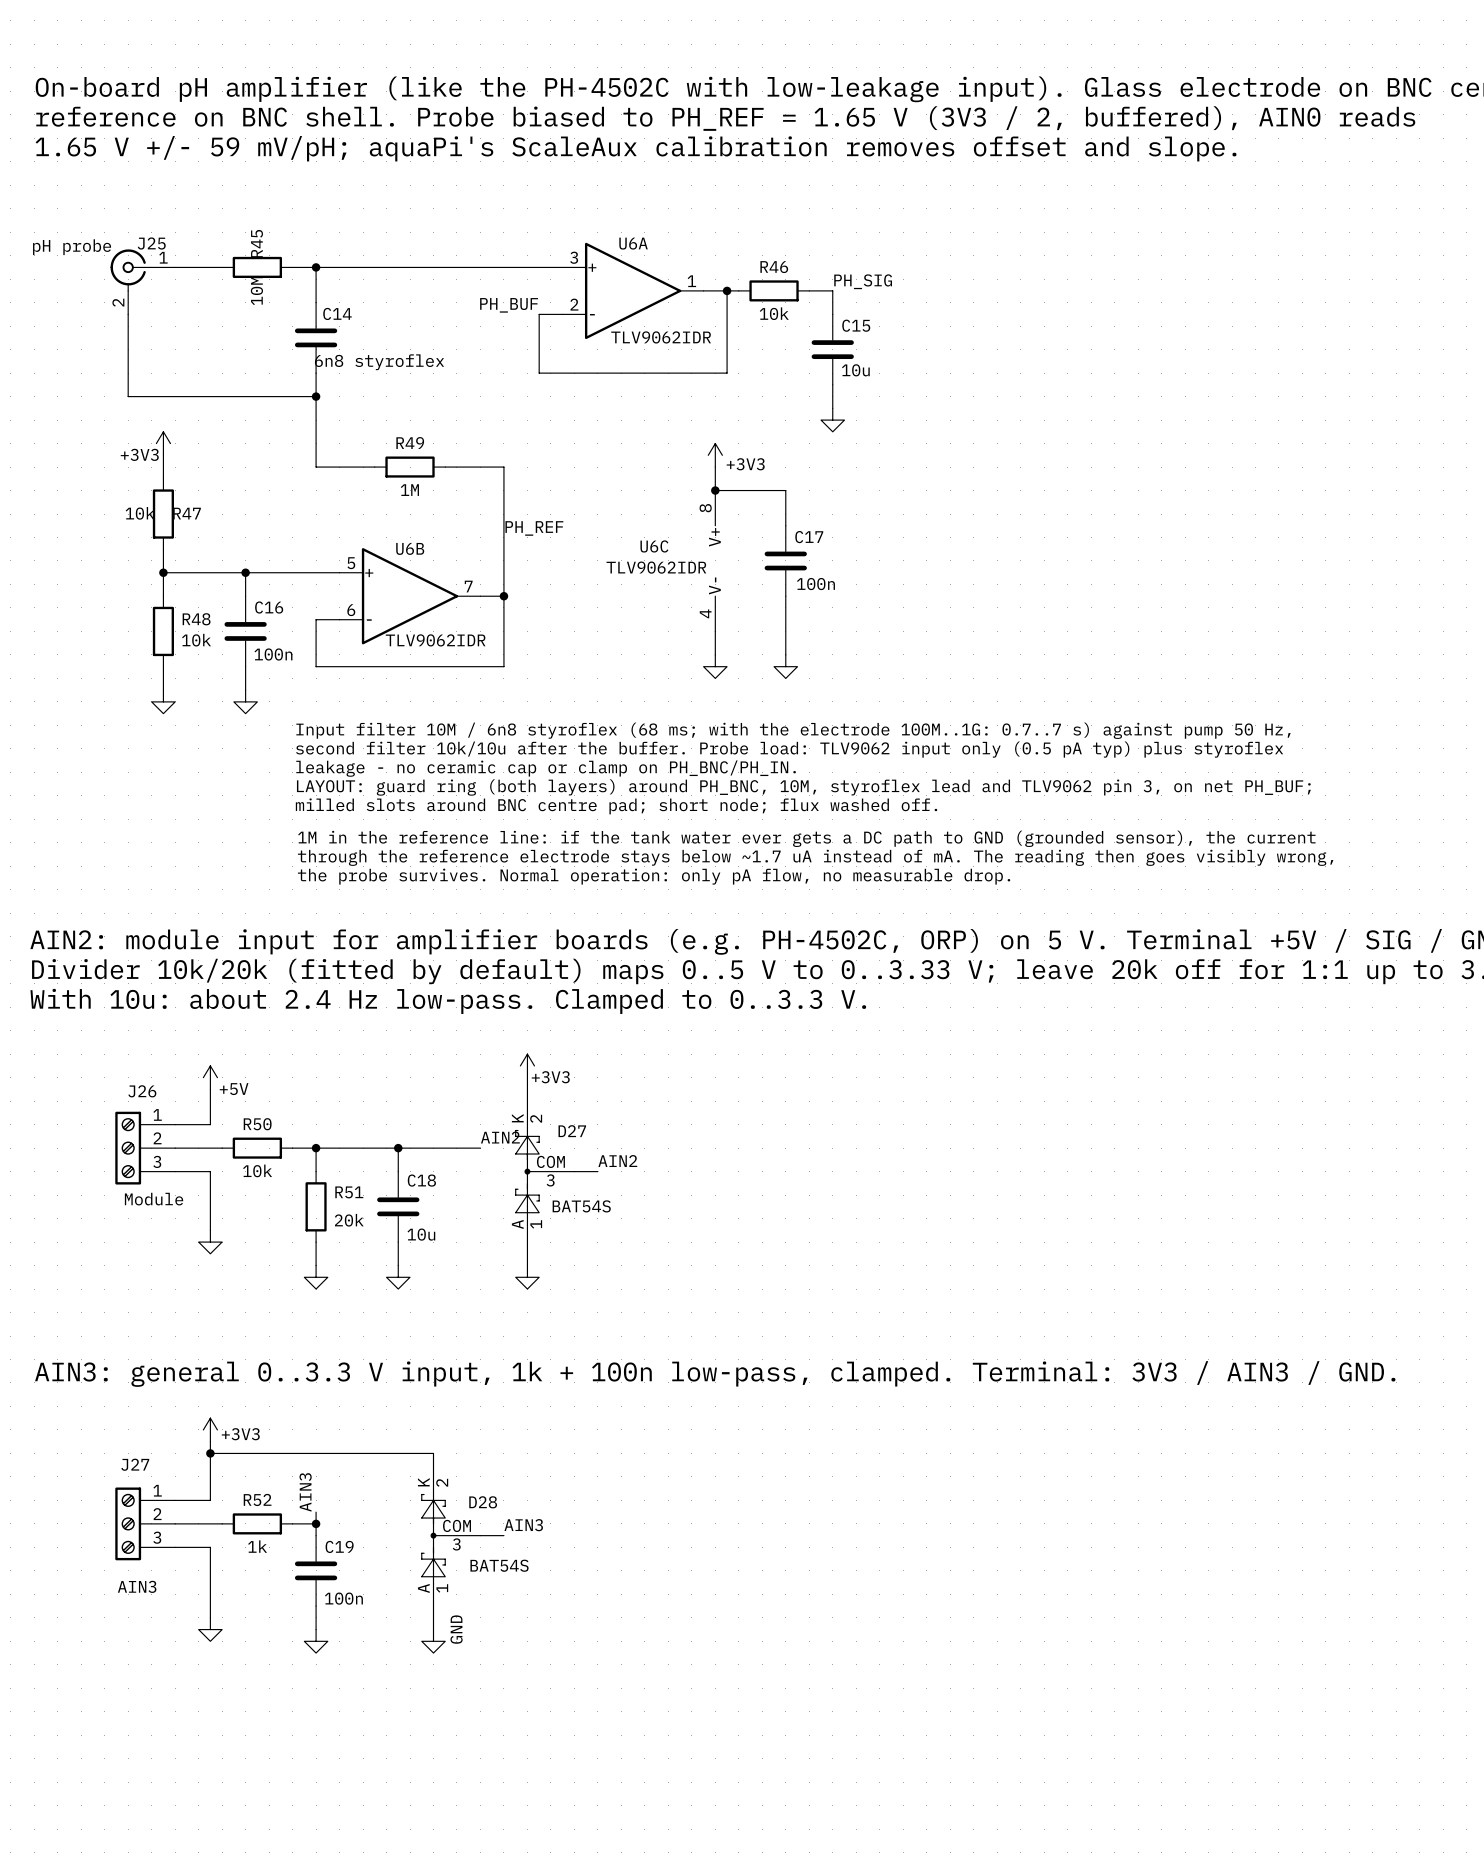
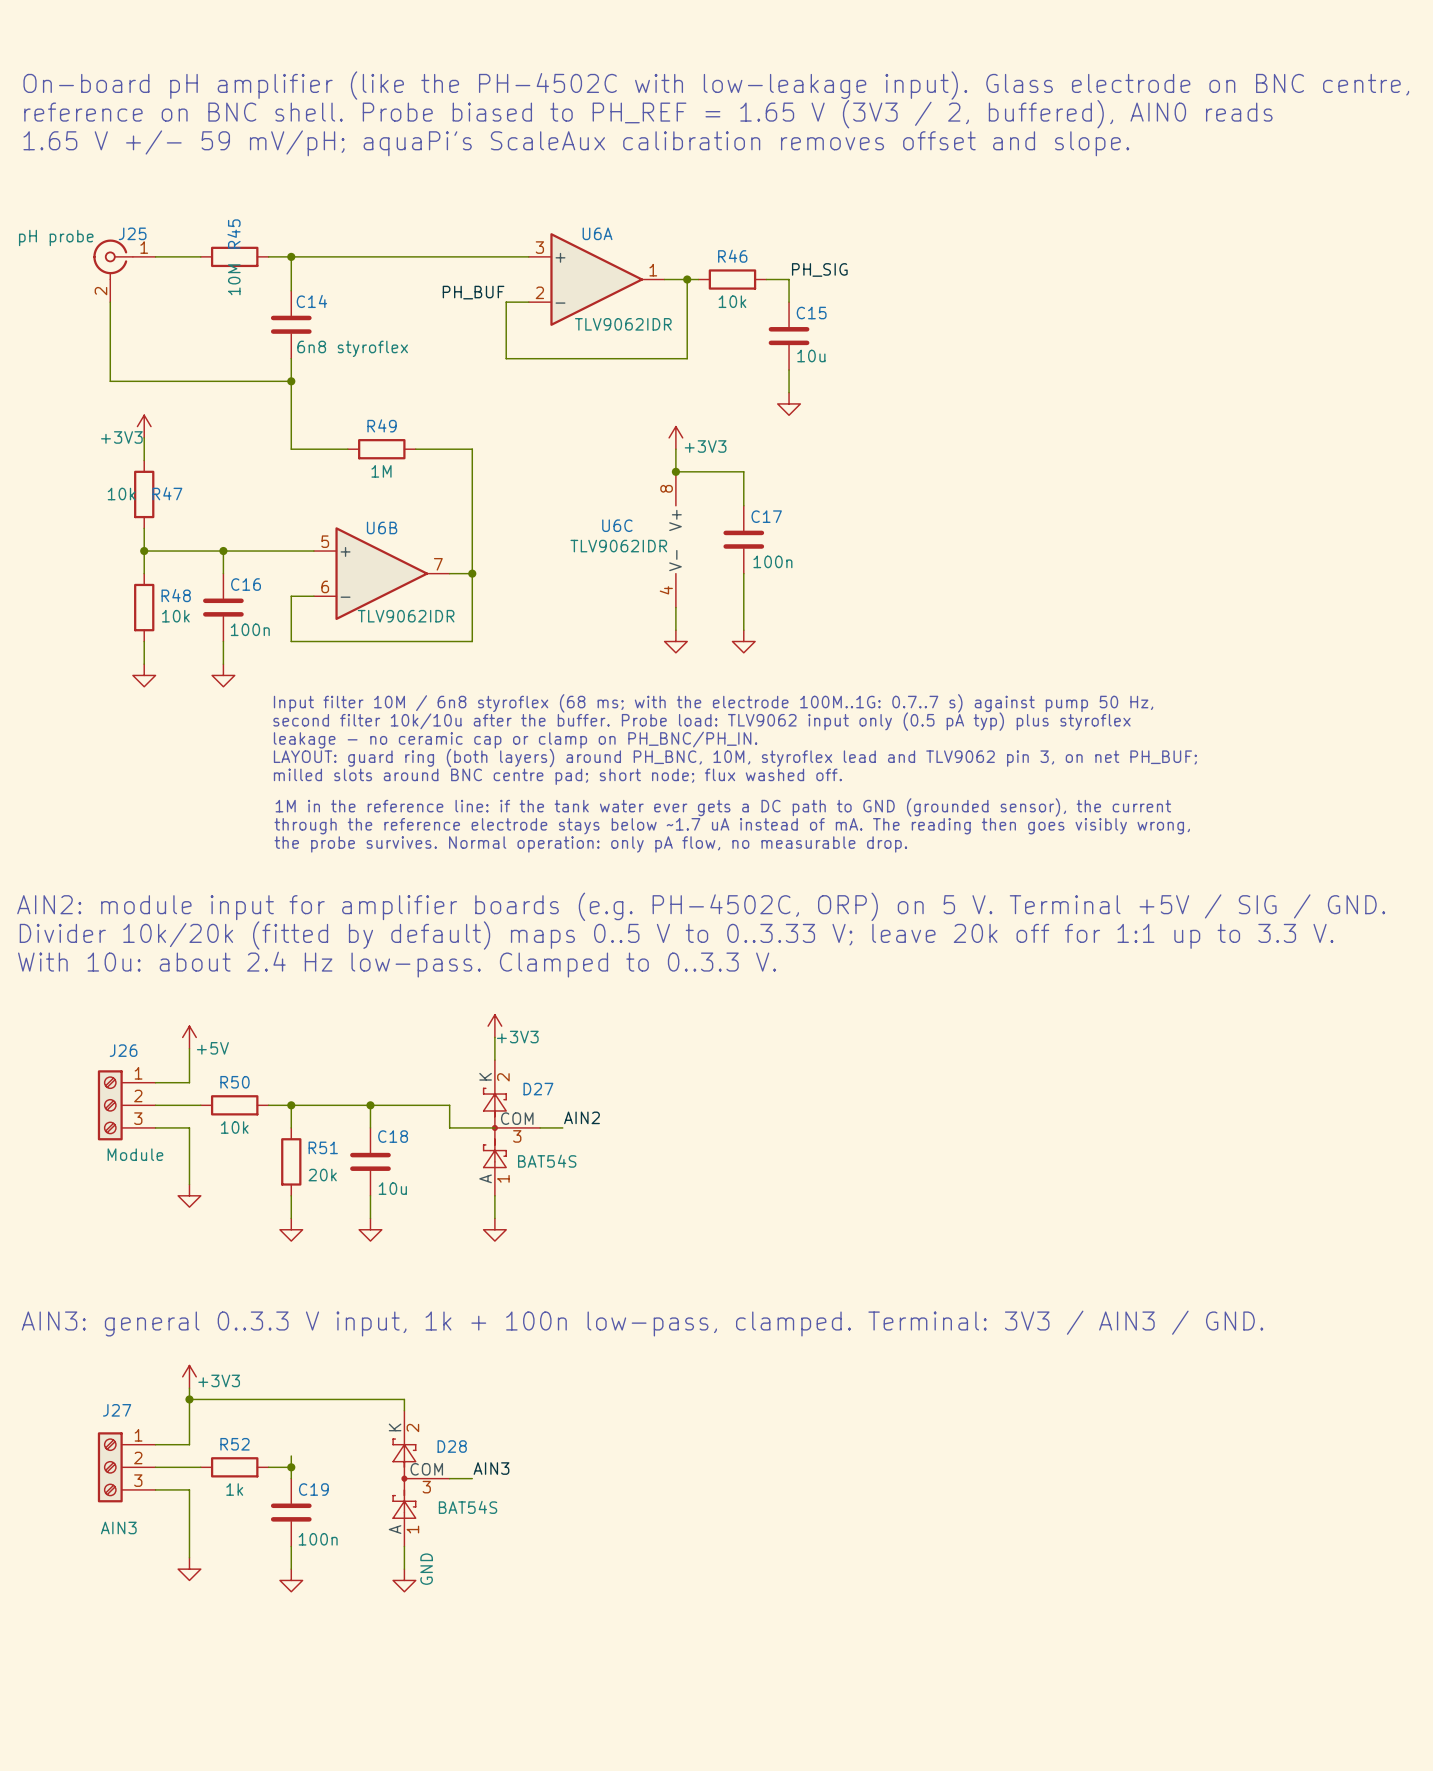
label: PH_REF (534, 528) -> none
label: AIN2 (500, 1137) -> none
wire: none -> (449, 1105) (449, 1127) (494, 1127)
label: AIN3 (305, 1492) -> none

